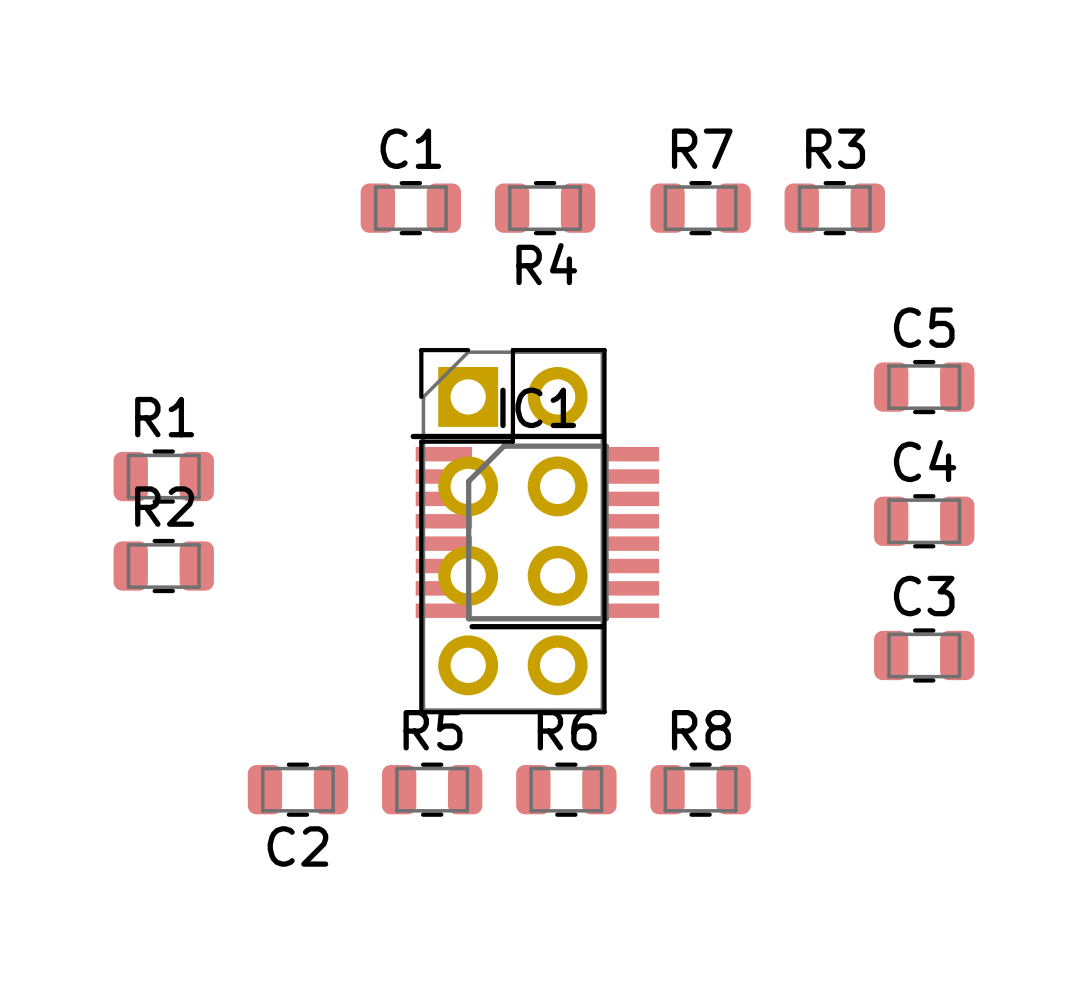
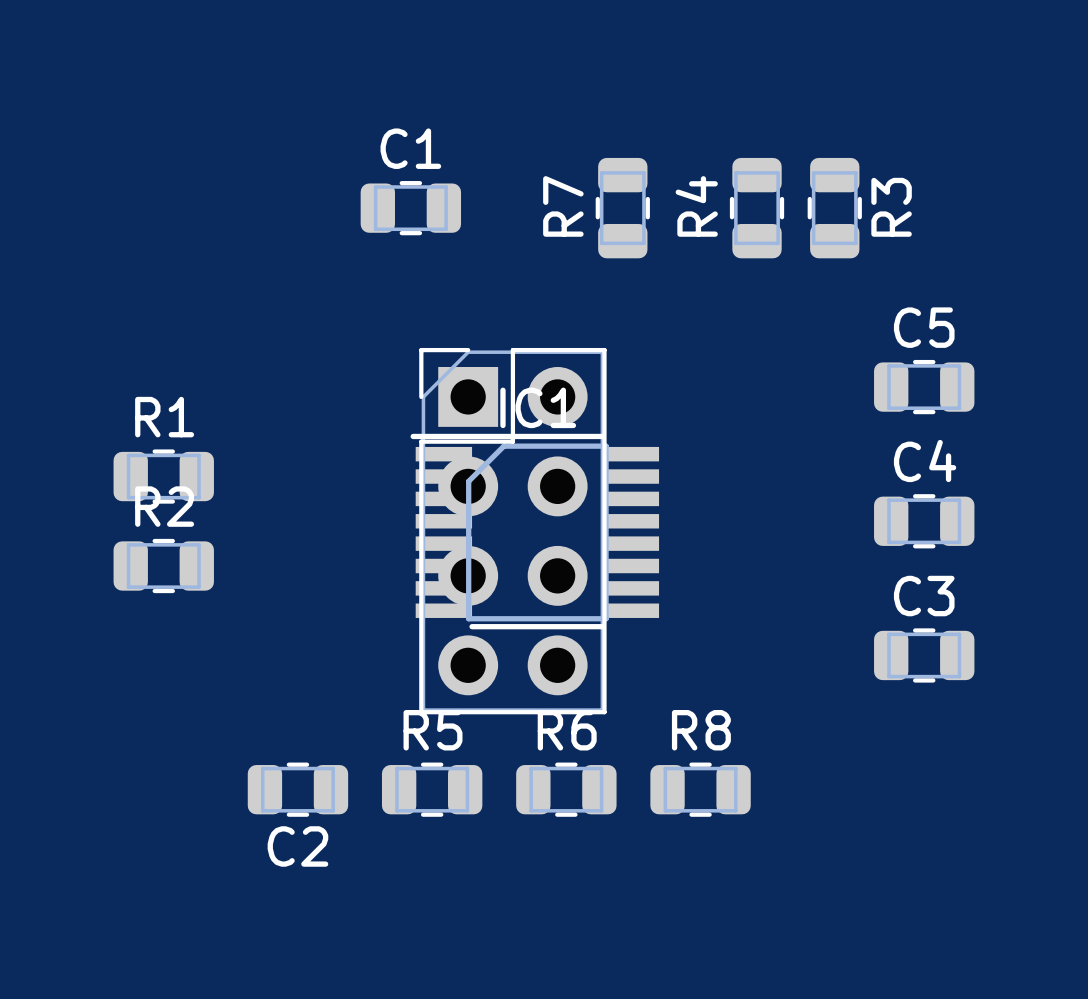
R7 name position: R7 (702, 148) -> R7 (563, 206)
R4 rotation: 0° (545, 208) -> 90° clockwise (757, 208)
R4 position: (545, 208) -> (757, 208)
R7 rotation: 0° (700, 208) -> 90° clockwise (622, 208)
R7 position: (700, 208) -> (622, 208)
R3 rotation: 0° (834, 208) -> 90° clockwise (834, 208)

